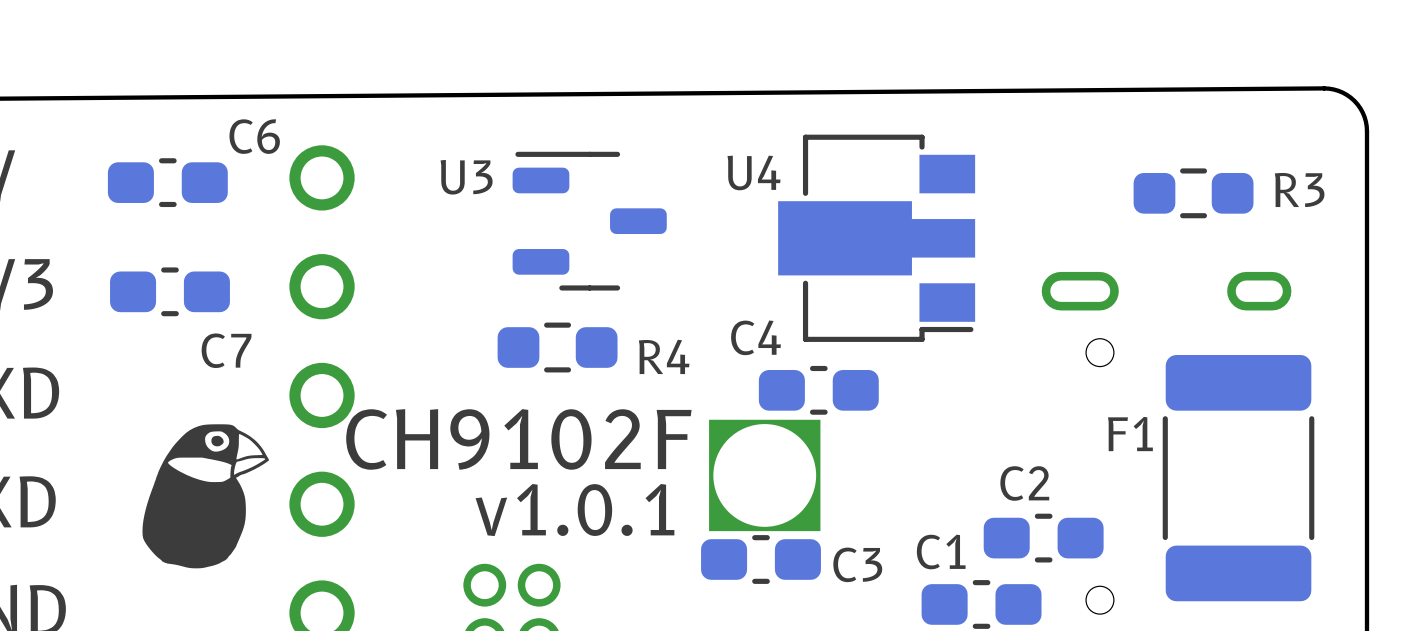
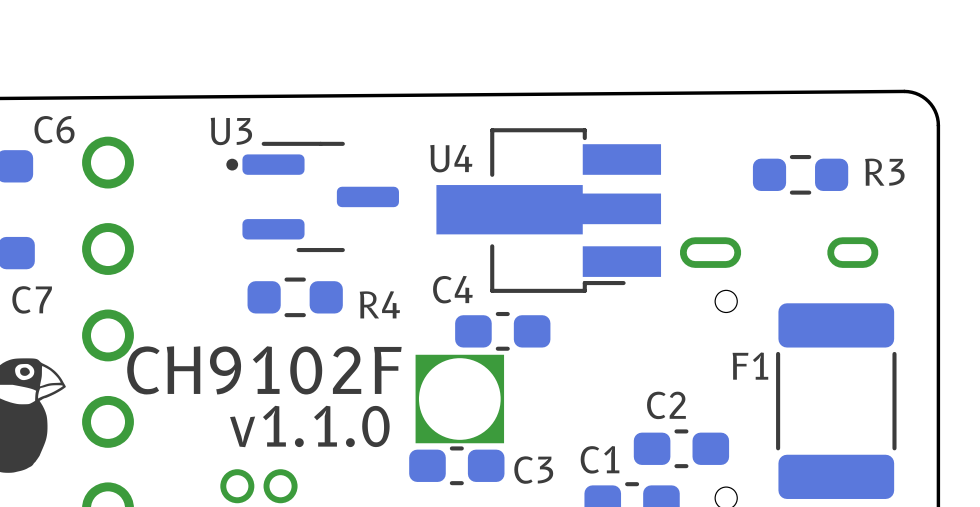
U4 footprint: [778, 134, 976, 342] -> [436, 128, 662, 293]
U3 footprint: [512, 151, 667, 291] -> [226, 141, 399, 253]
text: v1.0.1 (574, 510) -> v1.1.0 (309, 426)

